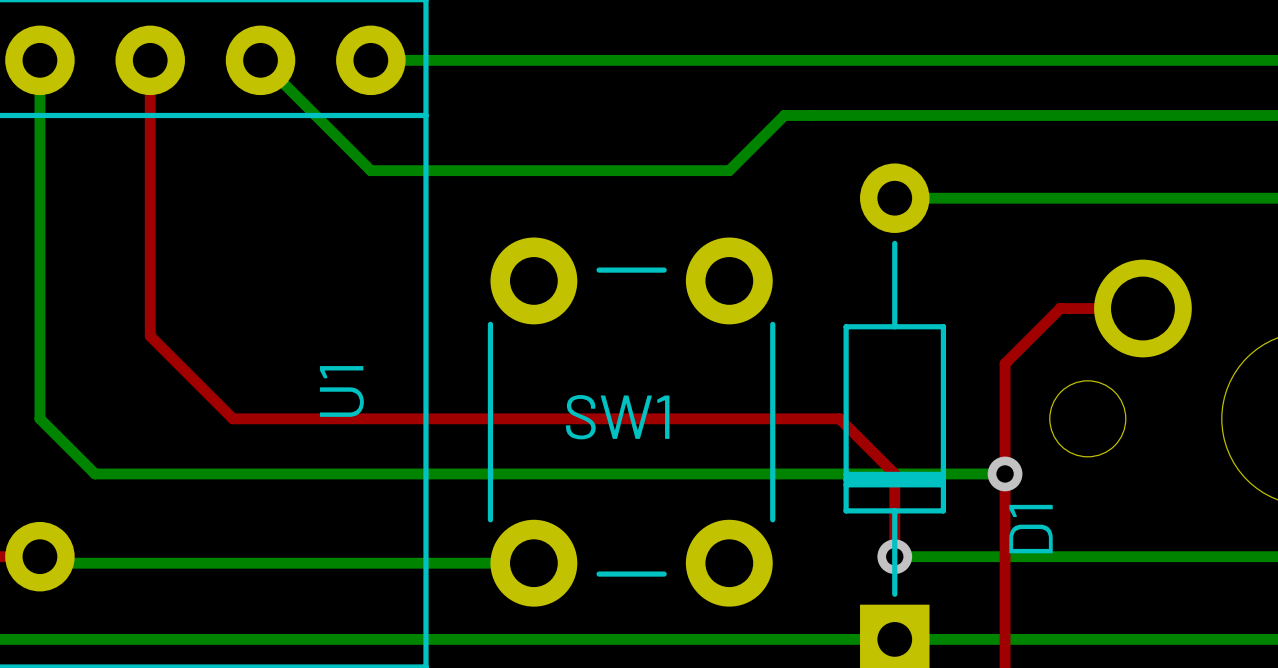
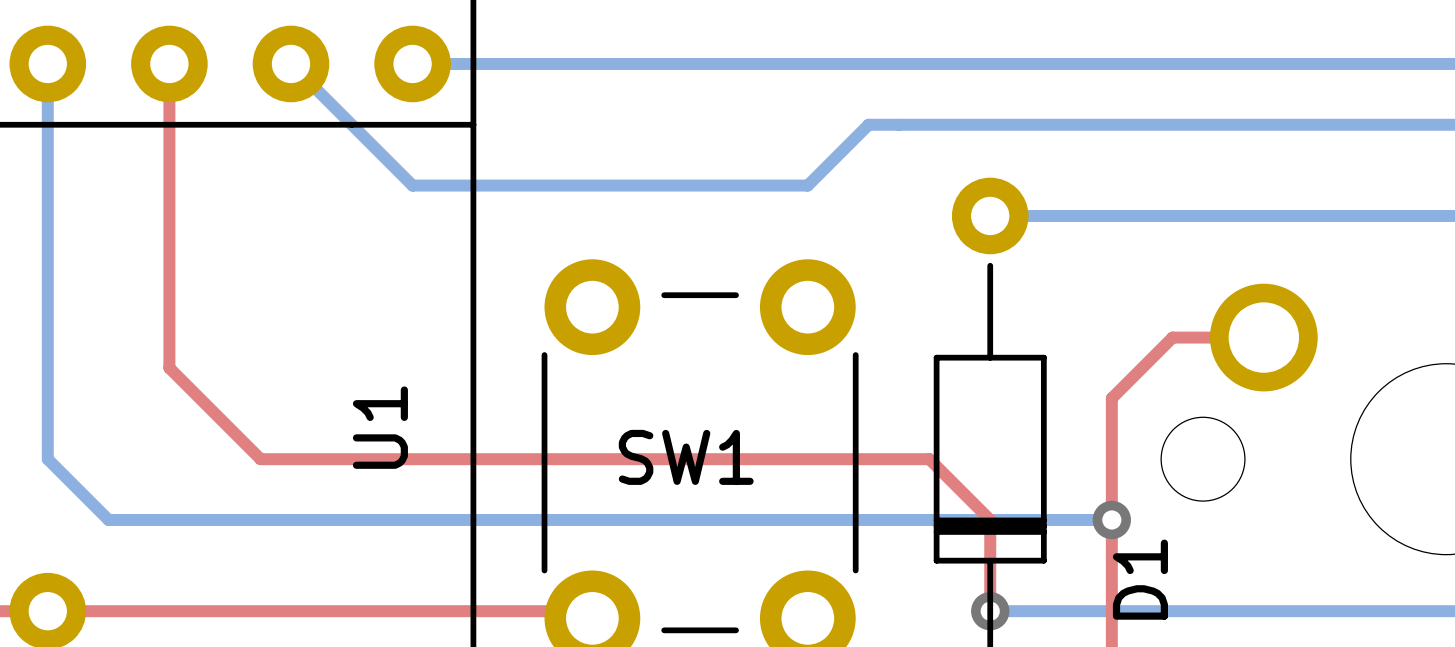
top track: none -> (47, 611) (585, 611)
bottom track: (39, 556) (46, 563) (533, 563) -> none

